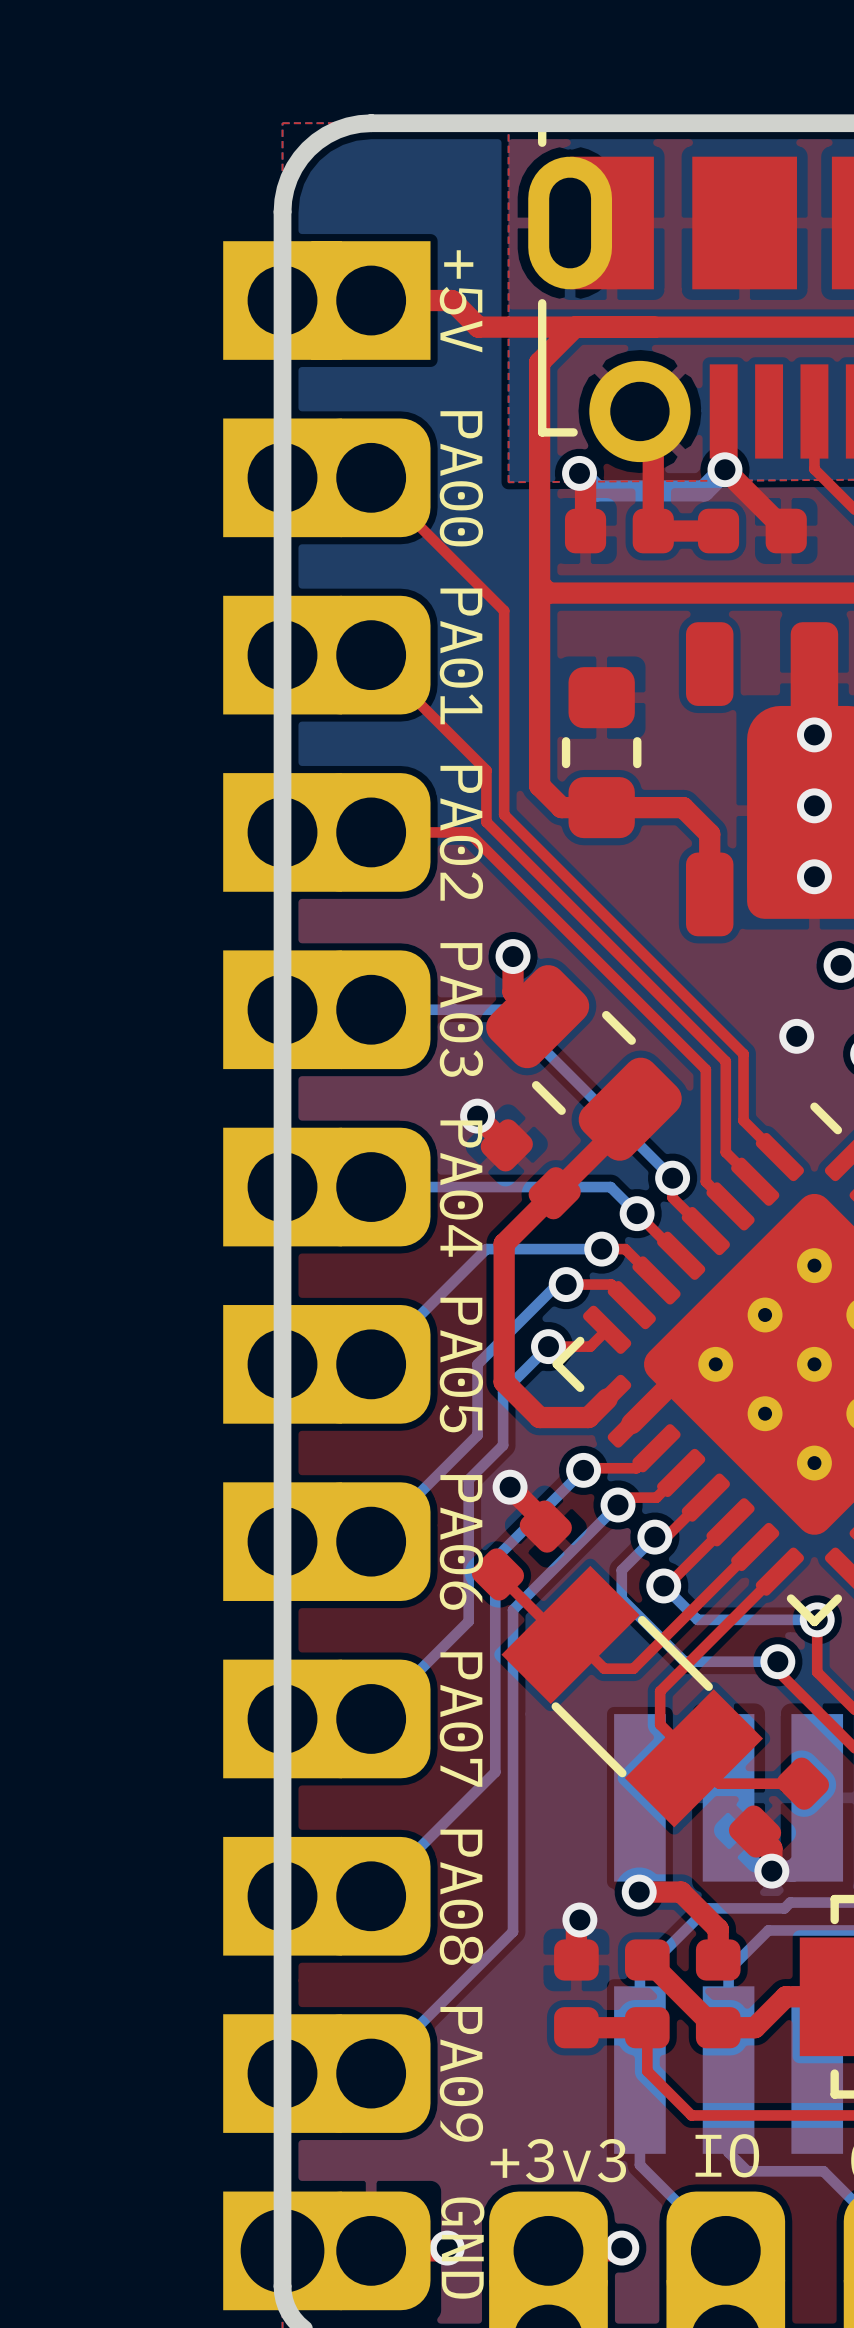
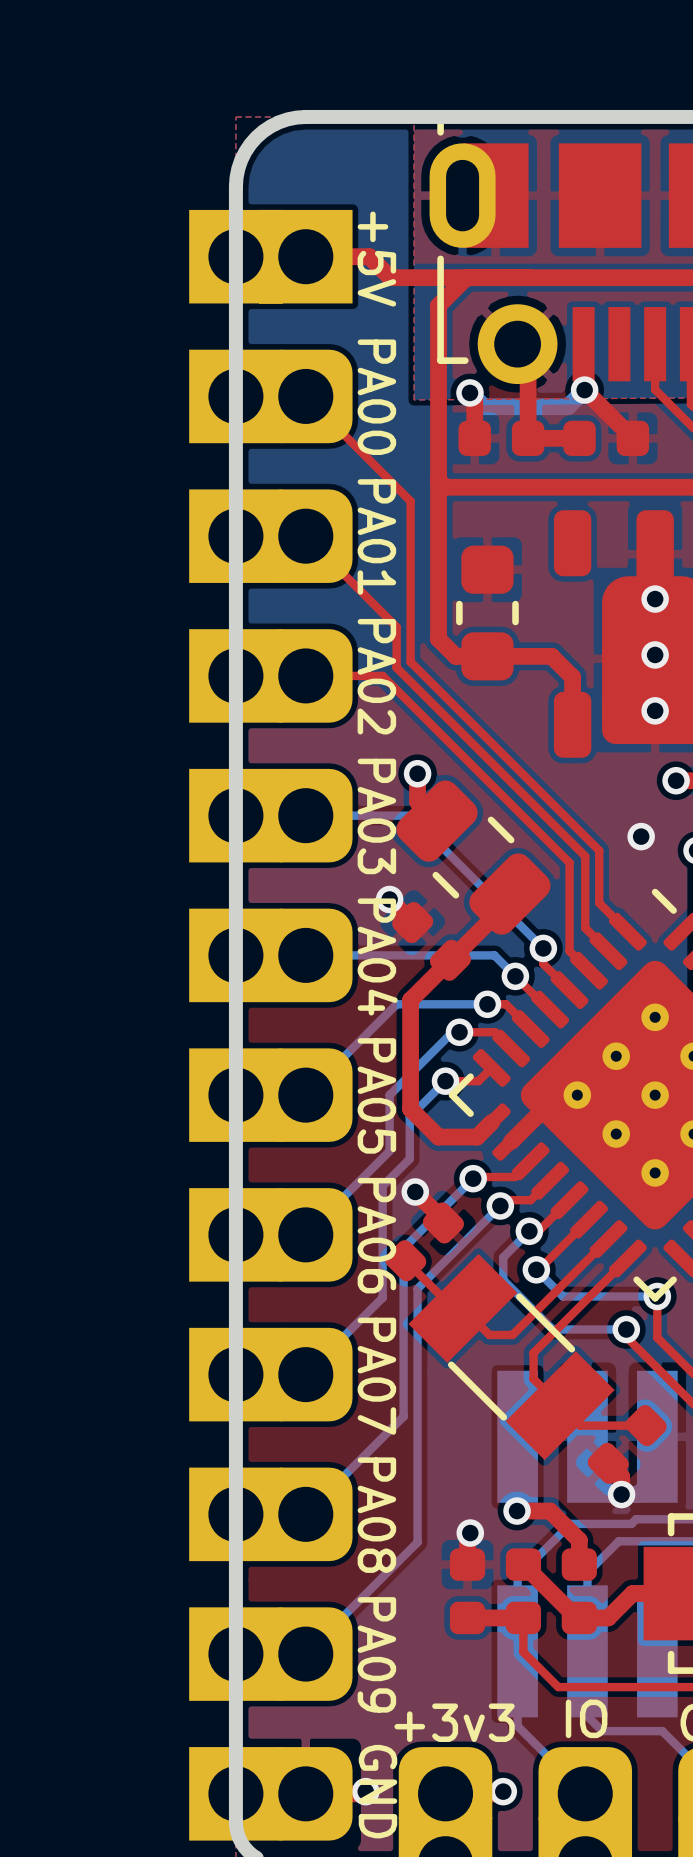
part footprint: [223, 241, 431, 2311] -> [189, 209, 353, 1841]

